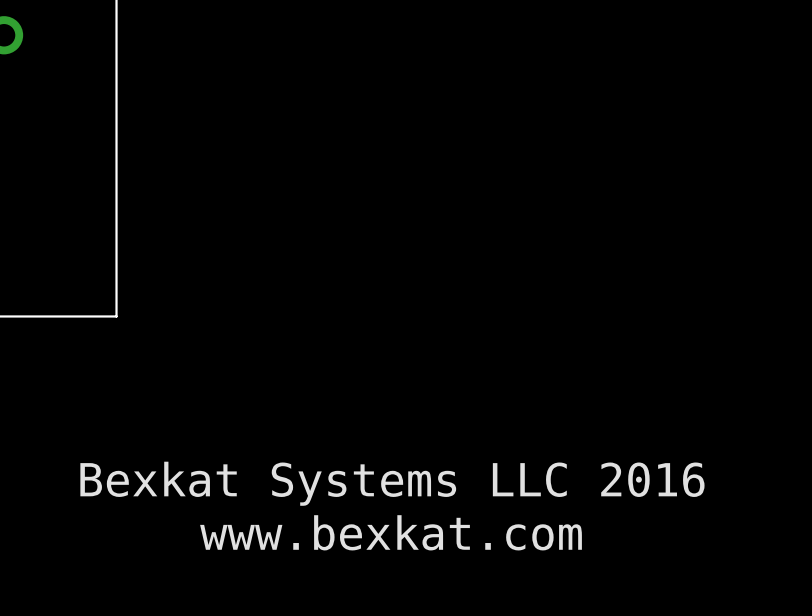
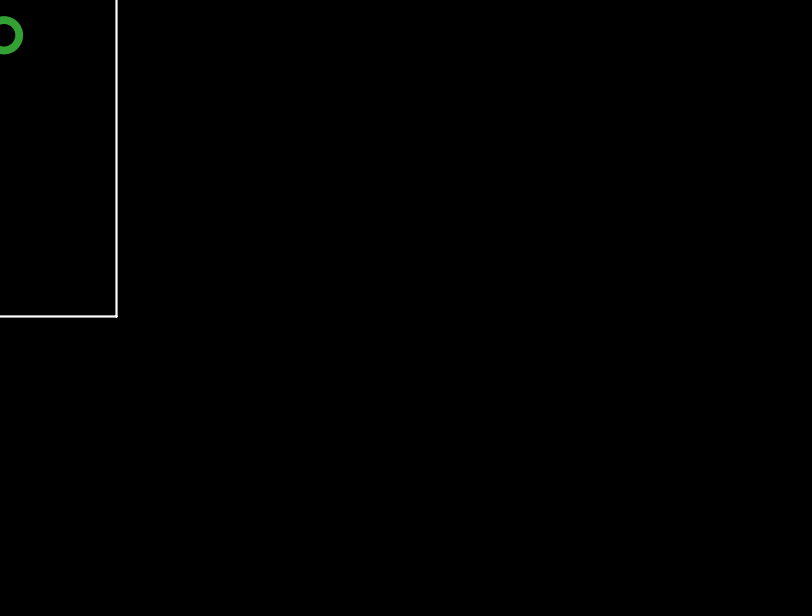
text: Bexkat Systems LLC 2016 (392, 483) -> none
text: www.bexkat.com (391, 532) -> none

